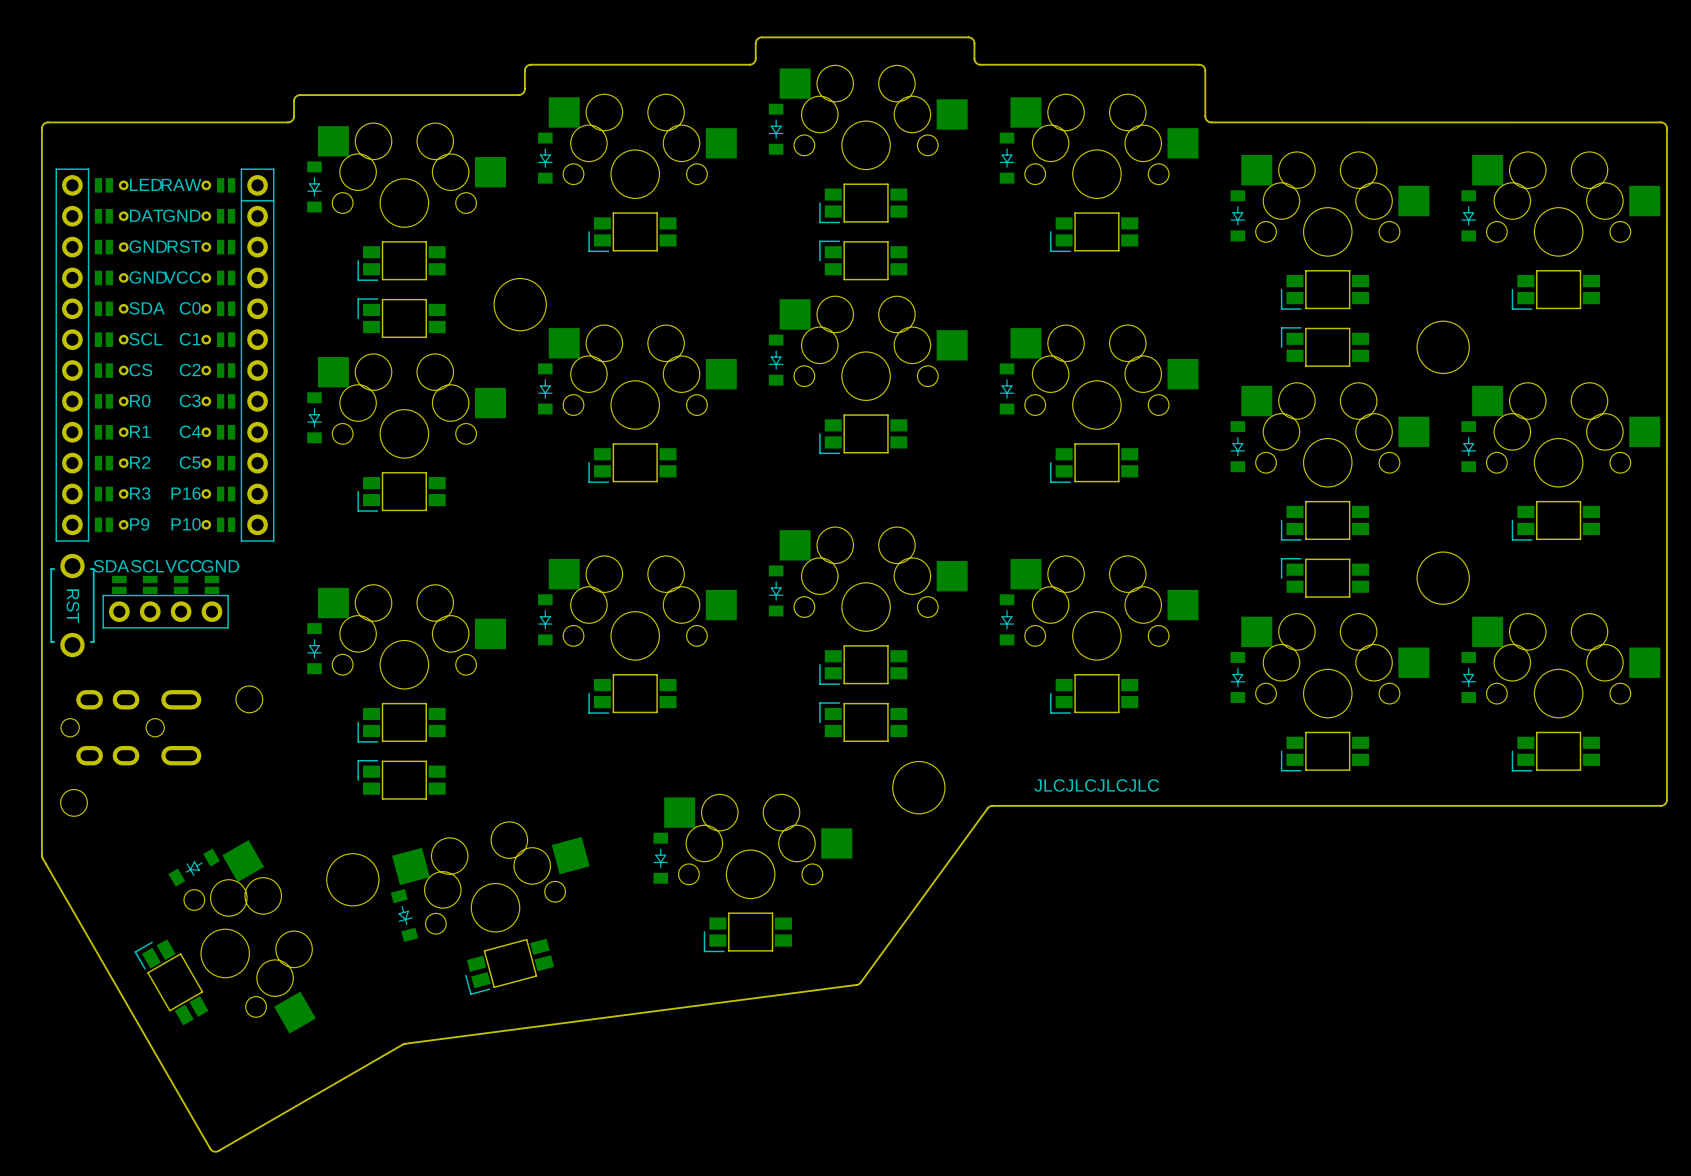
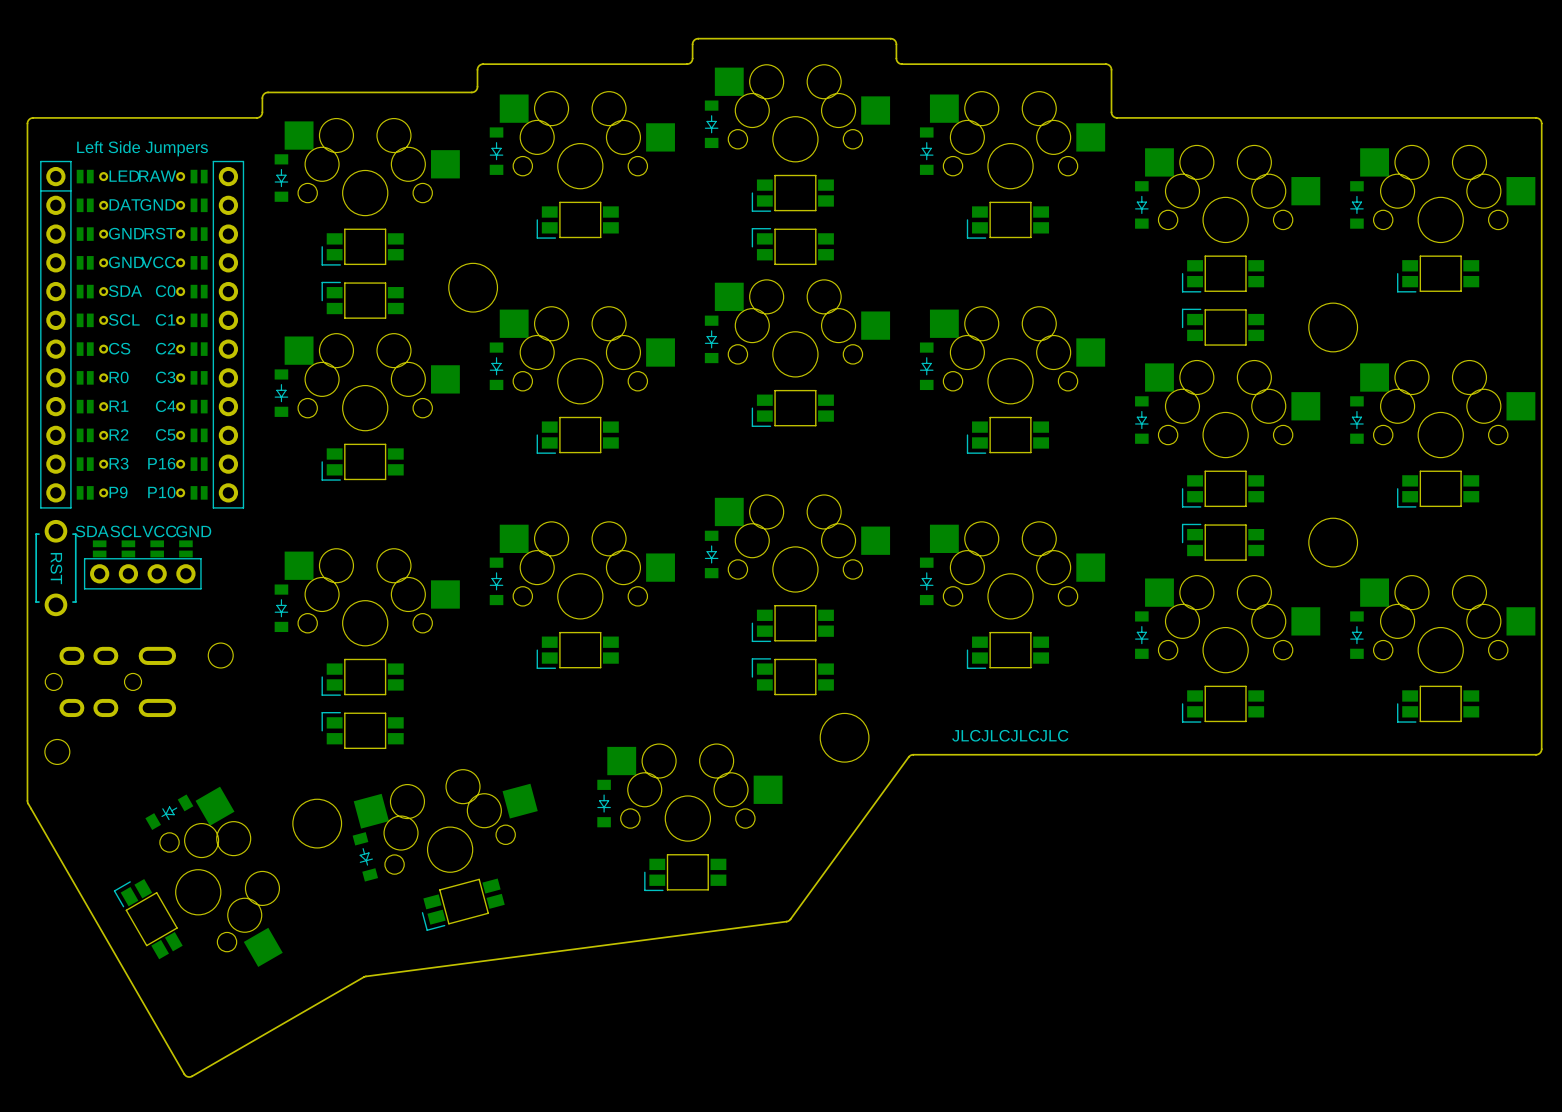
part footprint: [55, 168, 275, 542] -> [40, 160, 245, 509]

